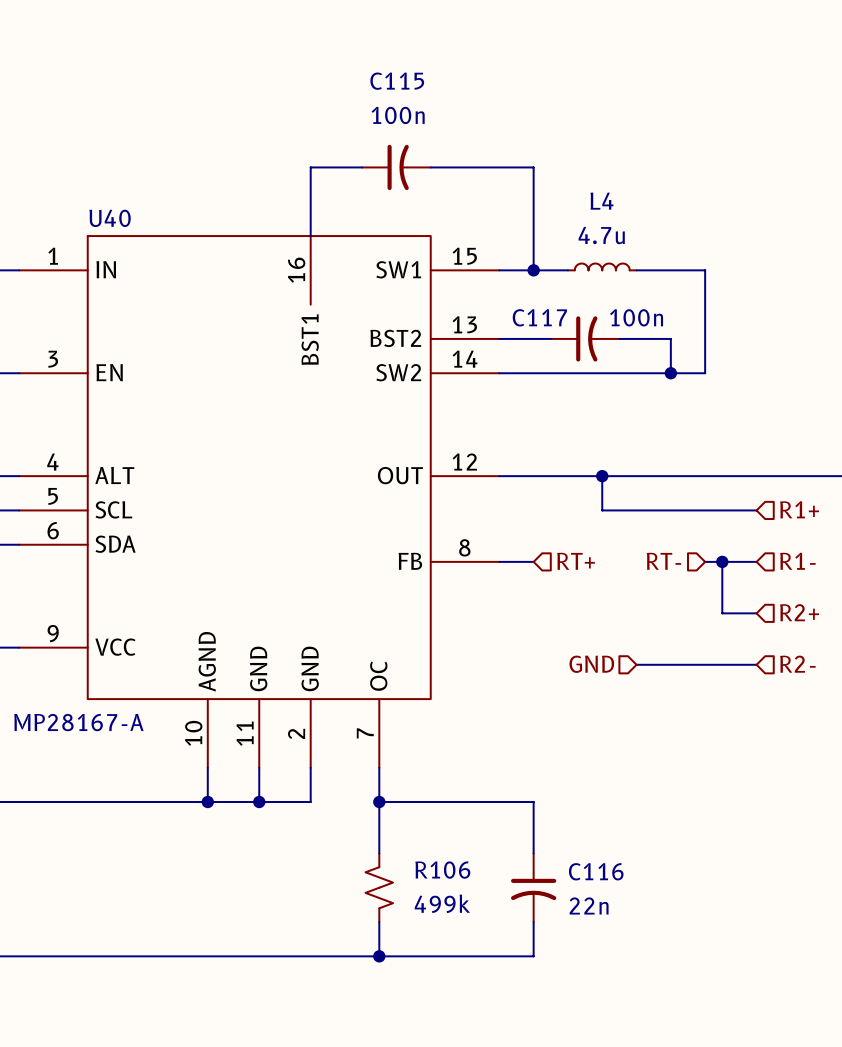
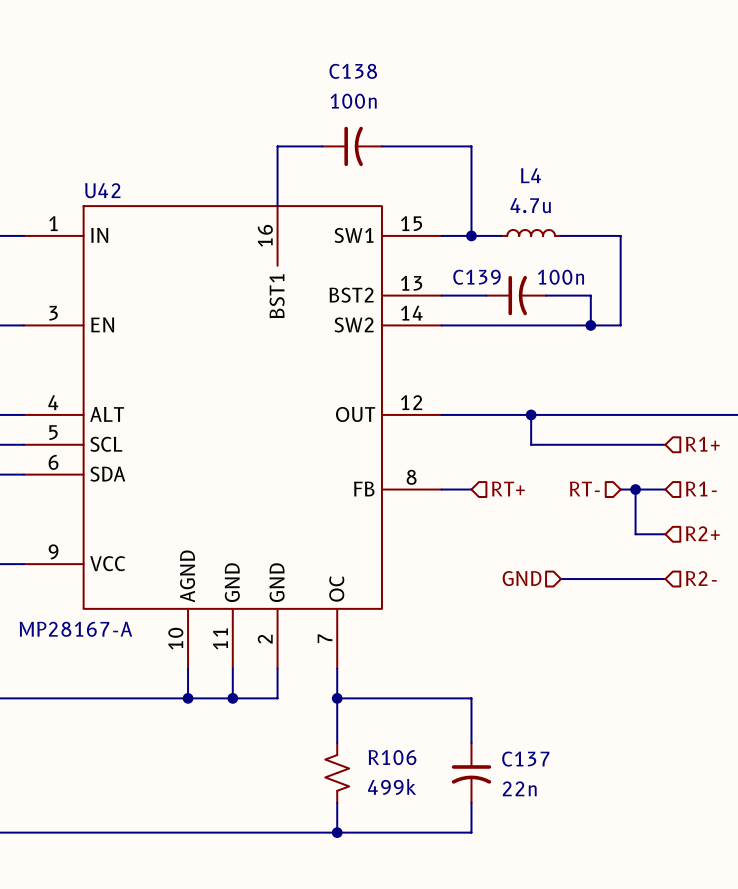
C115 name: C115 (397, 81) -> C138 (353, 71)
U40 name: U40 (110, 218) -> U42 (102, 190)
C117 name: C117 (539, 317) -> C139 (477, 277)
C116 name: C116 (596, 871) -> C137 (525, 759)

